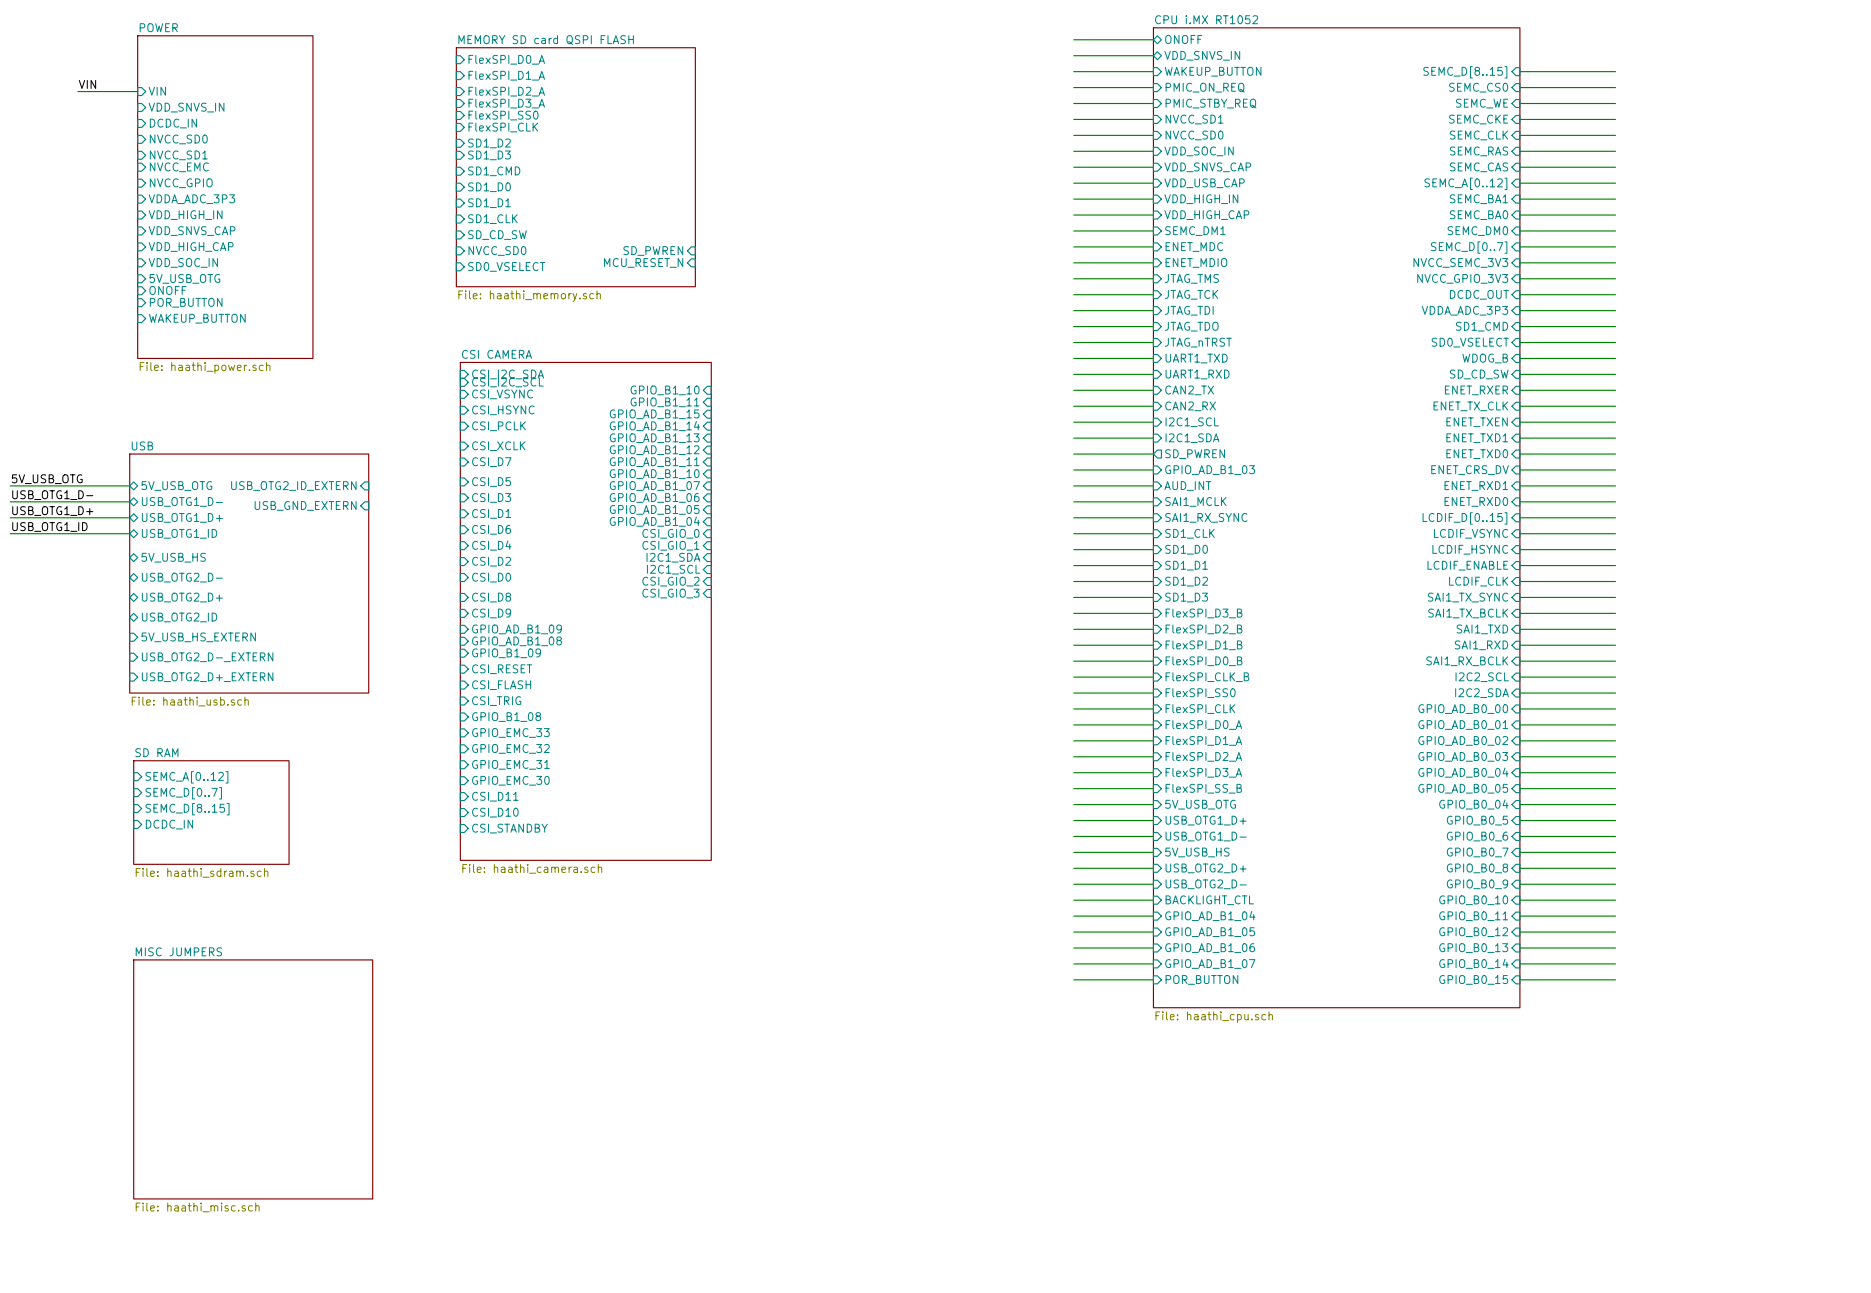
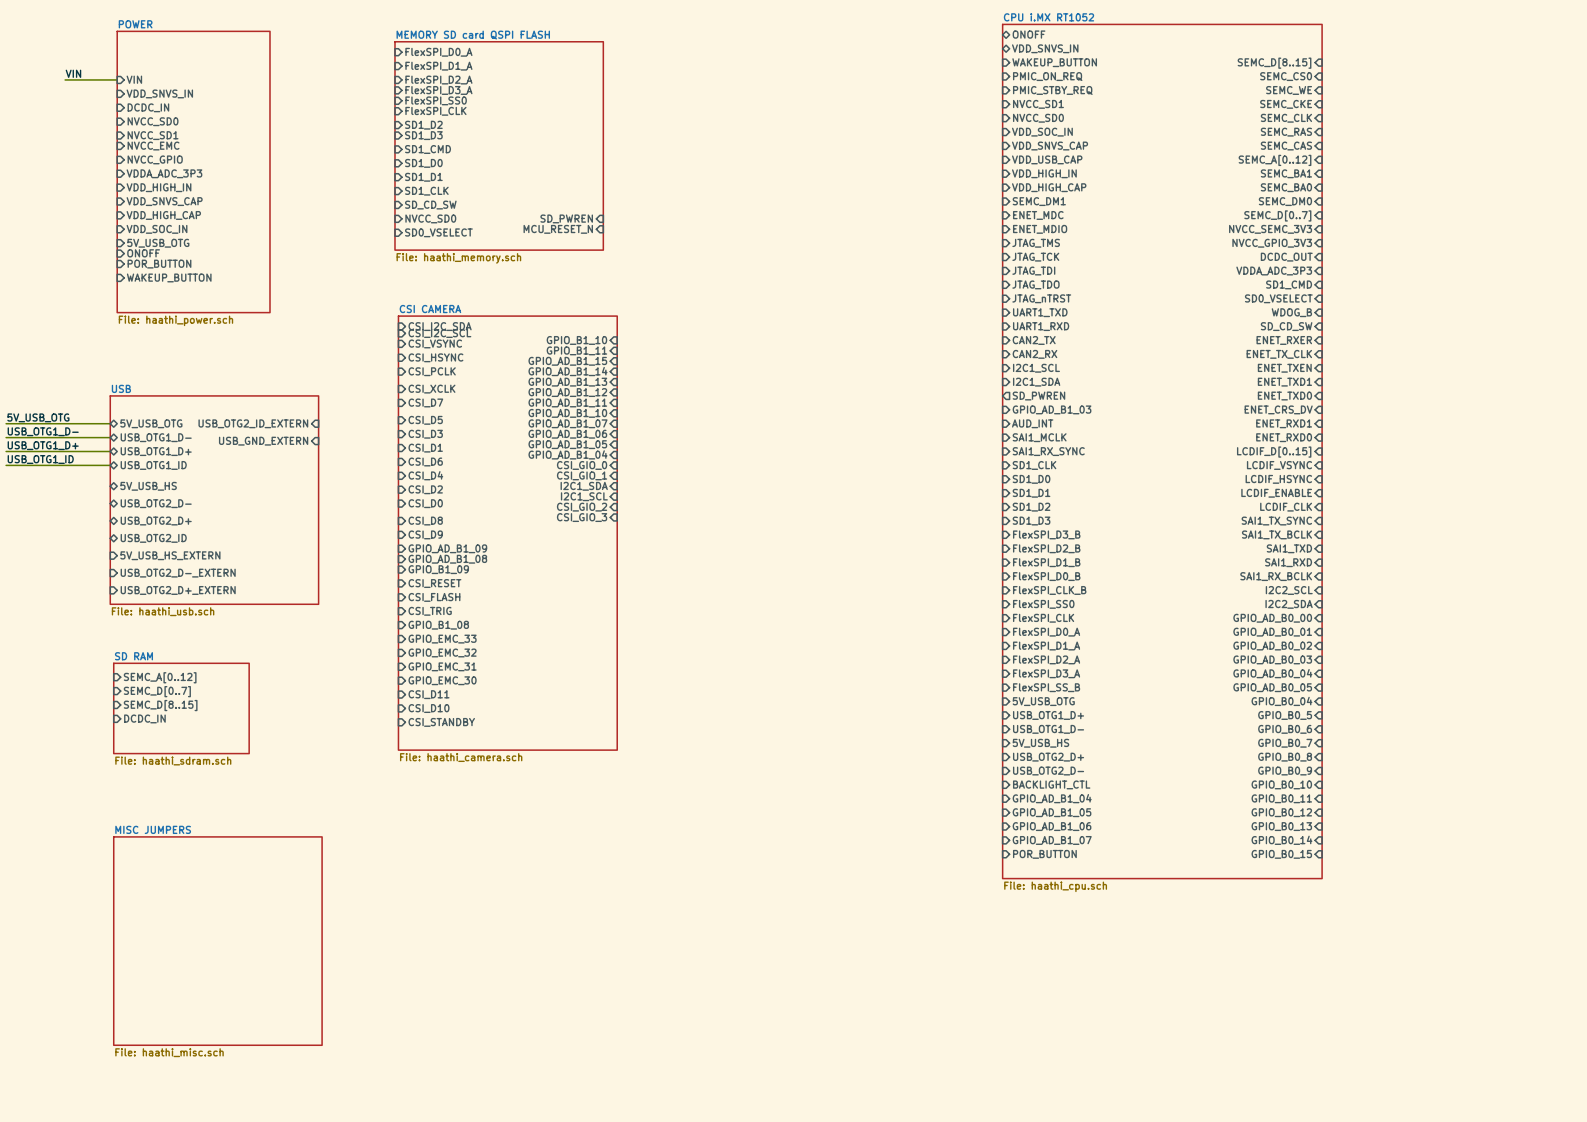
wire: (1073, 39) (1153, 39) -> none
wire: (1073, 55) (1153, 55) -> none
wire: (1073, 71) (1153, 71) -> none
wire: (1519, 71) (1615, 71) -> none
wire: (1073, 87) (1153, 87) -> none
wire: (1519, 87) (1615, 87) -> none
wire: (1073, 103) (1153, 103) -> none
wire: (1519, 103) (1615, 103) -> none
wire: (1073, 119) (1153, 119) -> none
wire: (1519, 119) (1615, 119) -> none
wire: (1073, 135) (1153, 135) -> none
wire: (1519, 135) (1615, 135) -> none
wire: (1073, 151) (1153, 151) -> none
wire: (1519, 151) (1615, 151) -> none
wire: (1073, 167) (1153, 167) -> none
wire: (1519, 167) (1615, 167) -> none
wire: (1073, 183) (1153, 183) -> none
wire: (1519, 183) (1615, 183) -> none
wire: (1073, 199) (1153, 199) -> none
wire: (1519, 199) (1615, 199) -> none
wire: (1073, 215) (1153, 215) -> none
wire: (1519, 215) (1615, 215) -> none
wire: (1073, 230) (1153, 230) -> none
wire: (1519, 230) (1615, 230) -> none
wire: (1073, 246) (1153, 246) -> none
wire: (1519, 246) (1615, 246) -> none
wire: (1073, 262) (1153, 262) -> none
wire: (1519, 262) (1615, 262) -> none
wire: (1073, 278) (1153, 278) -> none
wire: (1519, 278) (1615, 278) -> none
wire: (1073, 294) (1153, 294) -> none
wire: (1519, 294) (1615, 294) -> none
wire: (1073, 310) (1153, 310) -> none
wire: (1519, 310) (1615, 310) -> none
wire: (1073, 326) (1153, 326) -> none
wire: (1519, 326) (1615, 326) -> none
wire: (1073, 342) (1153, 342) -> none
wire: (1519, 342) (1615, 342) -> none
wire: (1073, 358) (1153, 358) -> none
wire: (1519, 358) (1615, 358) -> none
wire: (1073, 374) (1153, 374) -> none
wire: (1519, 374) (1615, 374) -> none
wire: (1073, 390) (1153, 390) -> none
wire: (1519, 390) (1615, 390) -> none
wire: (1073, 406) (1153, 406) -> none
wire: (1519, 406) (1615, 406) -> none
wire: (1073, 422) (1153, 422) -> none
wire: (1519, 422) (1615, 422) -> none
wire: (1073, 438) (1153, 438) -> none
wire: (1519, 438) (1615, 438) -> none
wire: (1073, 454) (1153, 454) -> none
wire: (1519, 454) (1615, 454) -> none
wire: (1073, 469) (1153, 469) -> none
wire: (1519, 469) (1615, 469) -> none
wire: (1073, 485) (1153, 485) -> none
wire: (1519, 485) (1615, 485) -> none
wire: (1073, 501) (1153, 501) -> none
wire: (1519, 501) (1615, 501) -> none
wire: (1073, 517) (1153, 517) -> none
wire: (1519, 517) (1615, 517) -> none
wire: (1073, 533) (1153, 533) -> none
wire: (1519, 533) (1615, 533) -> none
wire: (1073, 549) (1153, 549) -> none
wire: (1519, 549) (1615, 549) -> none
wire: (1073, 565) (1153, 565) -> none
wire: (1519, 565) (1615, 565) -> none
wire: (1073, 581) (1153, 581) -> none
wire: (1519, 581) (1615, 581) -> none
wire: (1073, 597) (1153, 597) -> none
wire: (1519, 597) (1615, 597) -> none
wire: (1073, 613) (1153, 613) -> none
wire: (1519, 613) (1615, 613) -> none
wire: (1073, 629) (1153, 629) -> none
wire: (1519, 629) (1615, 629) -> none
wire: (1073, 645) (1153, 645) -> none
wire: (1519, 645) (1615, 645) -> none
wire: (1073, 661) (1153, 661) -> none
wire: (1519, 661) (1615, 661) -> none
wire: (1073, 677) (1153, 677) -> none
wire: (1519, 677) (1615, 677) -> none
wire: (1073, 693) (1153, 693) -> none
wire: (1519, 693) (1615, 693) -> none
wire: (1073, 708) (1153, 708) -> none
wire: (1519, 708) (1615, 708) -> none
wire: (1073, 724) (1153, 724) -> none
wire: (1519, 724) (1615, 724) -> none
wire: (1073, 740) (1153, 740) -> none
wire: (1519, 740) (1615, 740) -> none
wire: (1073, 756) (1153, 756) -> none
wire: (1519, 756) (1615, 756) -> none
wire: (1073, 772) (1153, 772) -> none
wire: (1519, 772) (1615, 772) -> none
wire: (1073, 788) (1153, 788) -> none
wire: (1519, 788) (1615, 788) -> none
wire: (1073, 804) (1153, 804) -> none
wire: (1519, 804) (1615, 804) -> none
wire: (1073, 820) (1153, 820) -> none
wire: (1519, 820) (1615, 820) -> none
wire: (1073, 836) (1153, 836) -> none
wire: (1519, 836) (1615, 836) -> none
wire: (1073, 852) (1153, 852) -> none
wire: (1519, 852) (1615, 852) -> none
wire: (1073, 868) (1153, 868) -> none
wire: (1519, 868) (1615, 868) -> none
wire: (1073, 884) (1153, 884) -> none
wire: (1519, 884) (1615, 884) -> none
wire: (1073, 900) (1153, 900) -> none
wire: (1519, 900) (1615, 900) -> none
wire: (1073, 916) (1153, 916) -> none
wire: (1519, 916) (1615, 916) -> none
wire: (1073, 932) (1153, 932) -> none
wire: (1519, 932) (1615, 932) -> none
wire: (1073, 947) (1153, 947) -> none
wire: (1519, 947) (1615, 947) -> none
wire: (1073, 963) (1153, 963) -> none
wire: (1519, 963) (1615, 963) -> none
wire: (1073, 979) (1153, 979) -> none
wire: (1519, 979) (1615, 979) -> none

